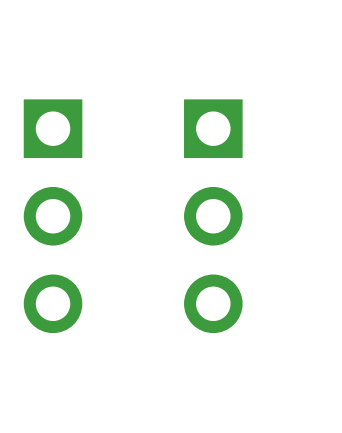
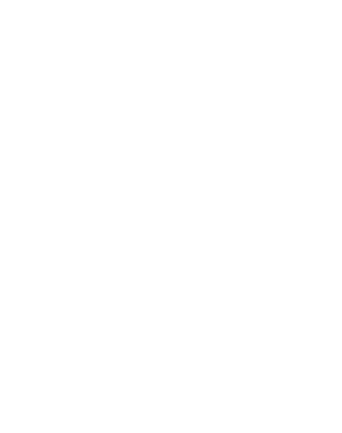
part: (53, 216) -> none
part: (213, 216) -> none

